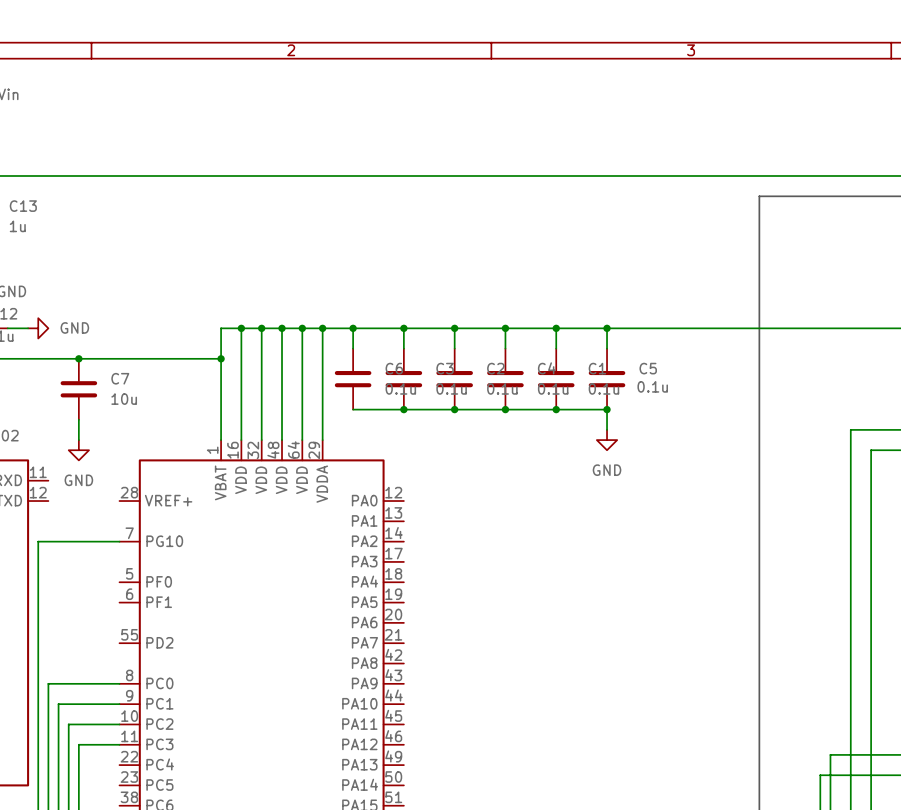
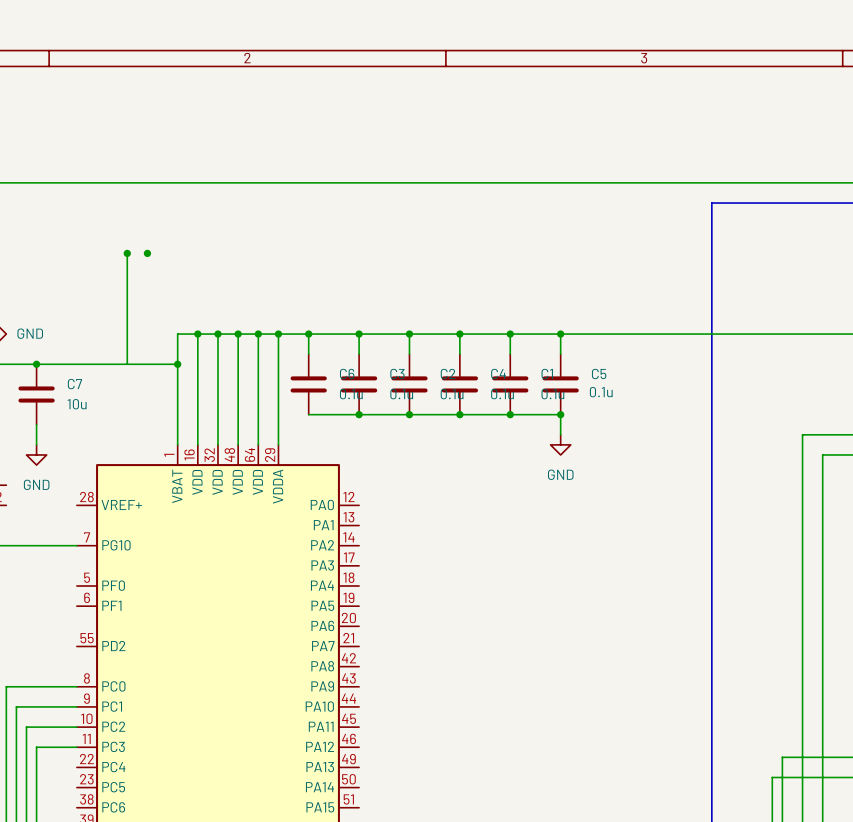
wire: none -> (127, 253) (127, 364)
junction: none -> (127, 253)
junction: none -> (147, 253)

